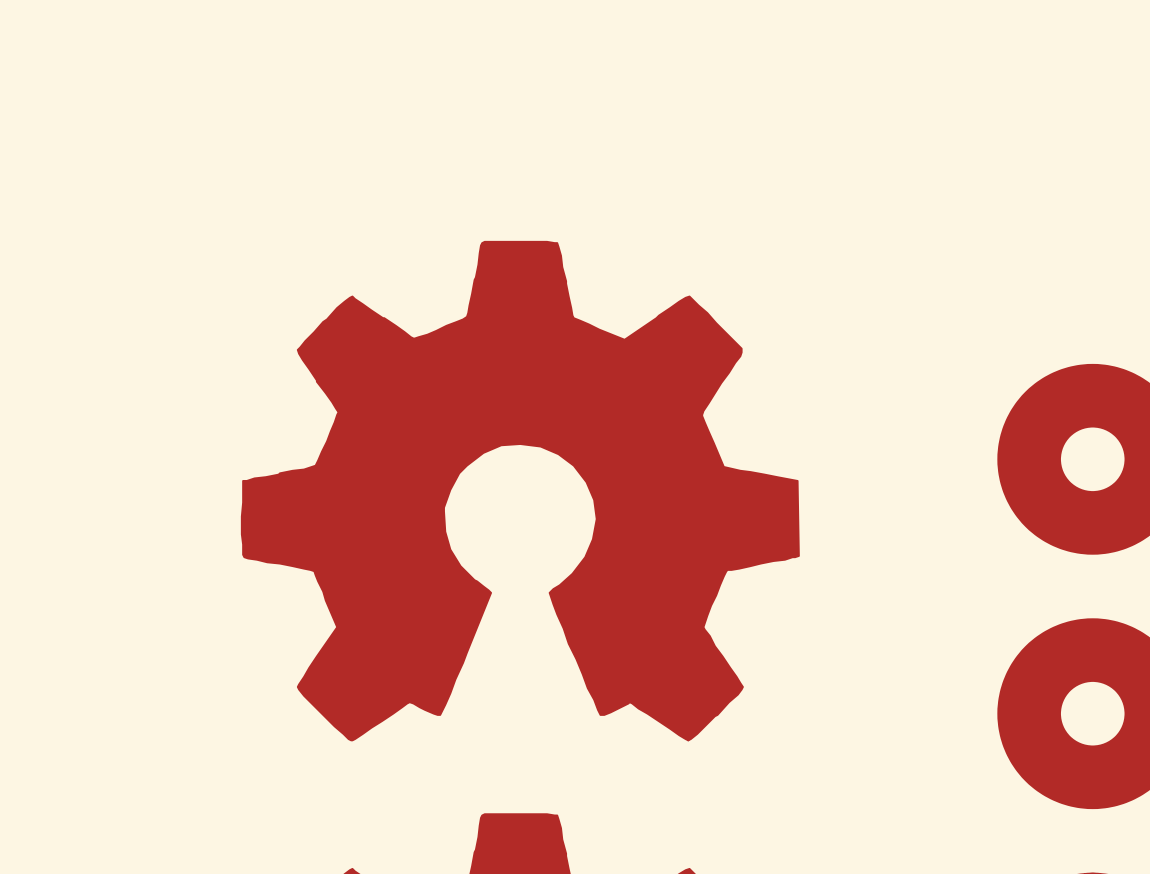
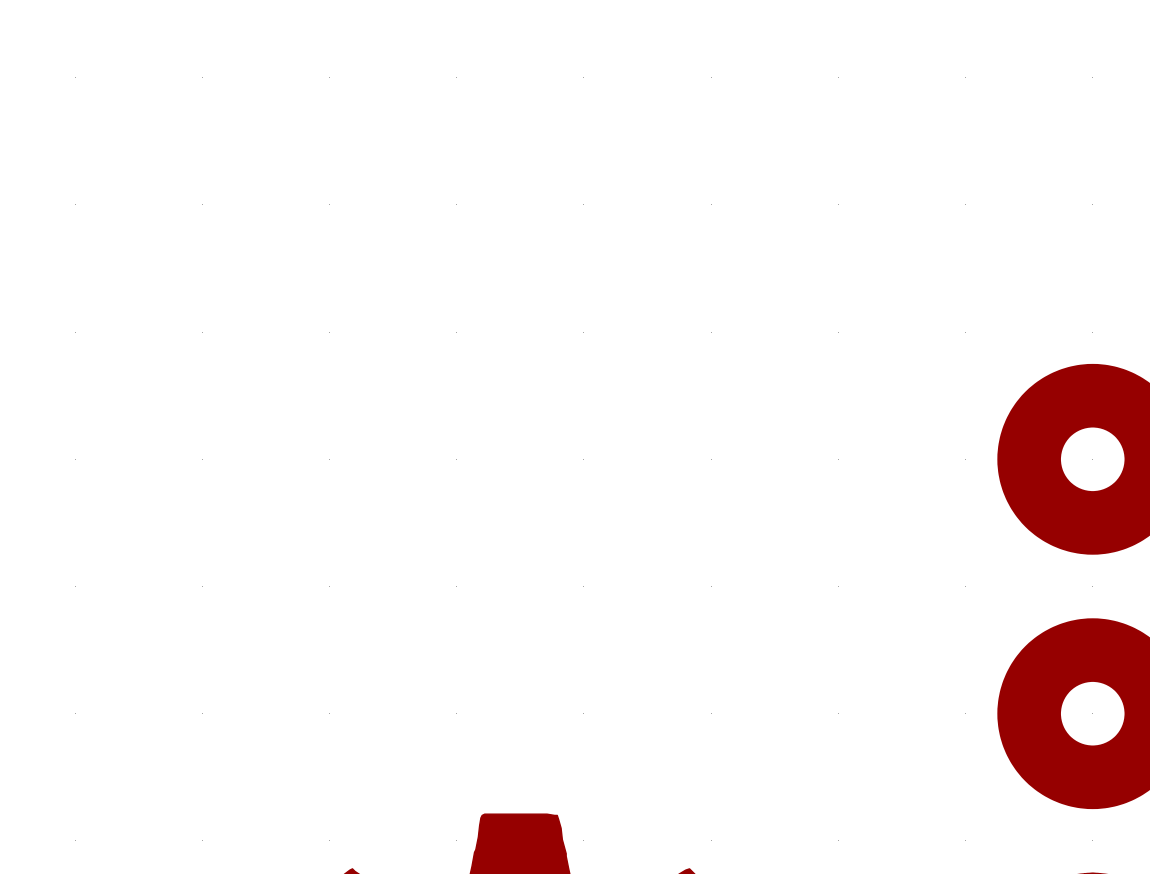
power symbol: (520, 491) -> none

